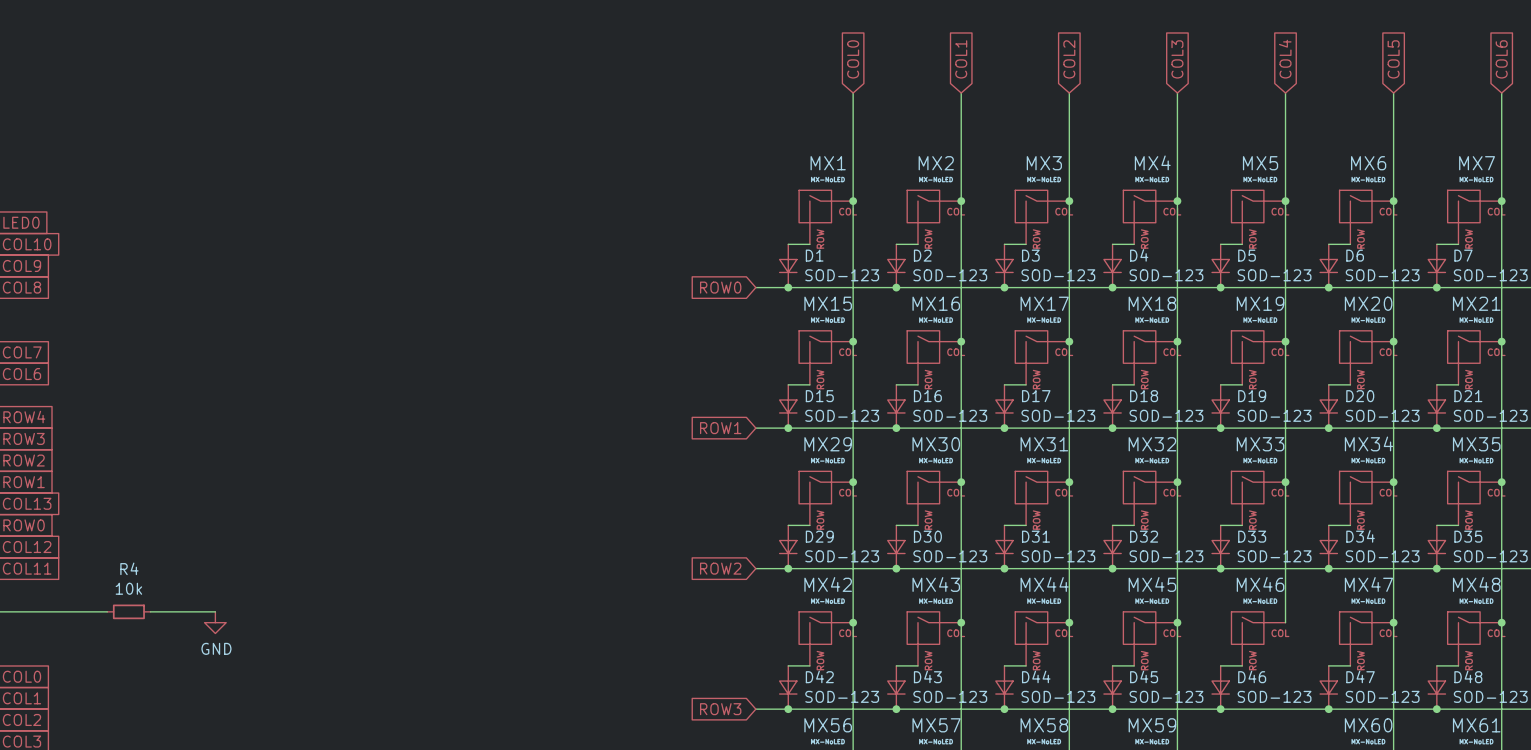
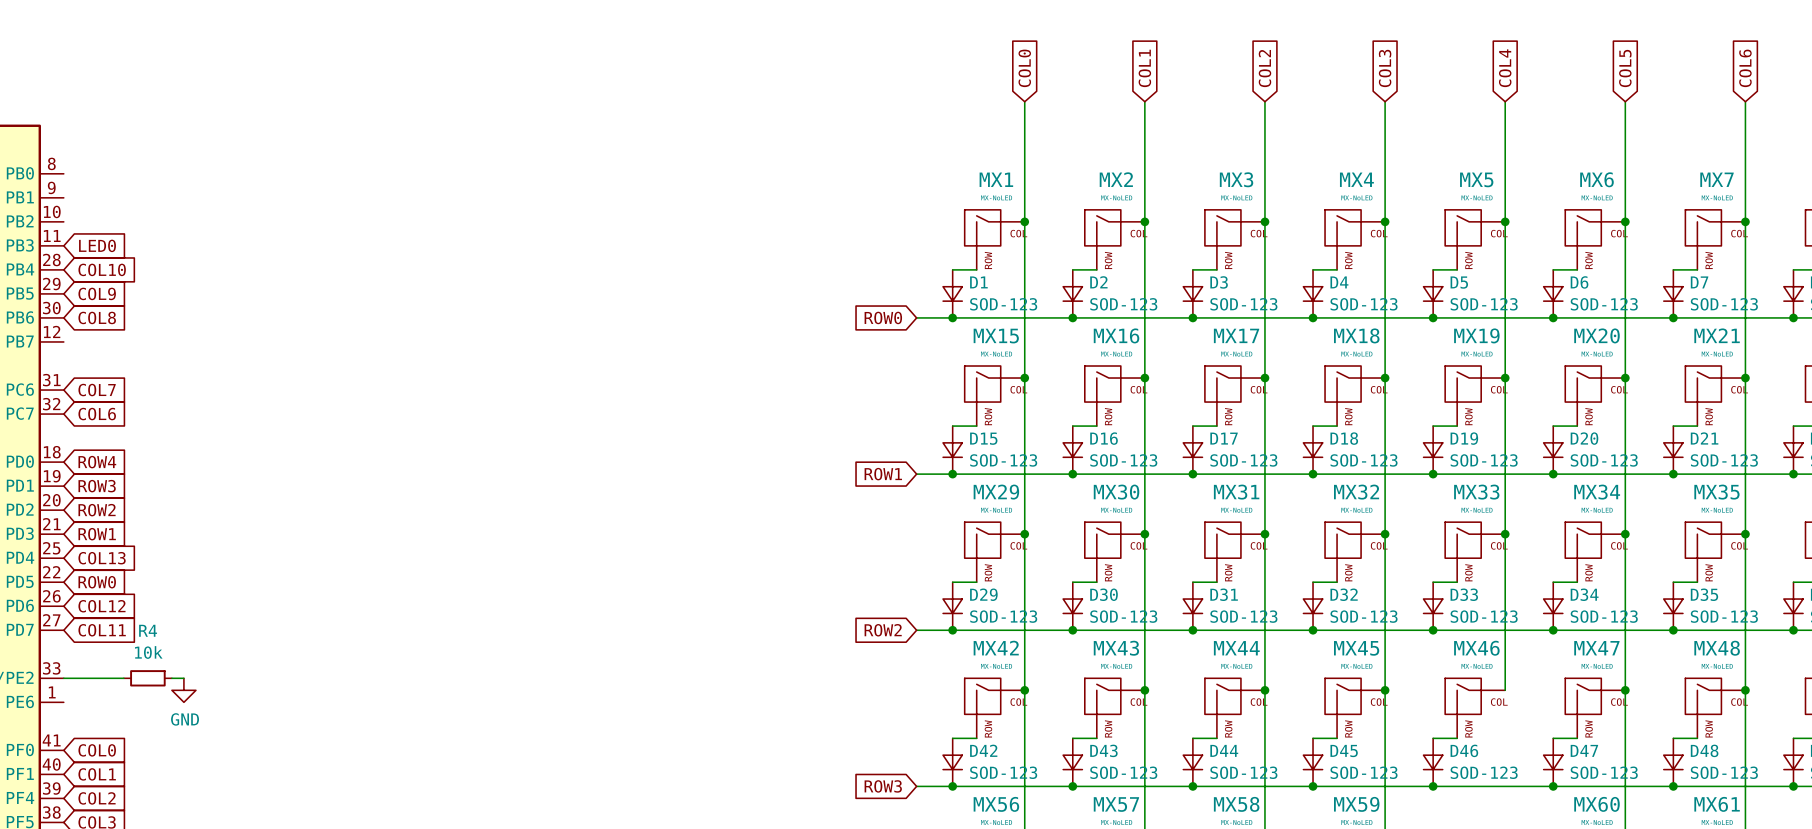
wire: (42, 611) (85, 611) -> none
wire: (96, 611) (107, 611) -> none
R4 position: (128, 611) -> (147, 678)
wire: (150, 611) (215, 611) -> none
power symbol position: GND (215, 622) -> GND (183, 690)

